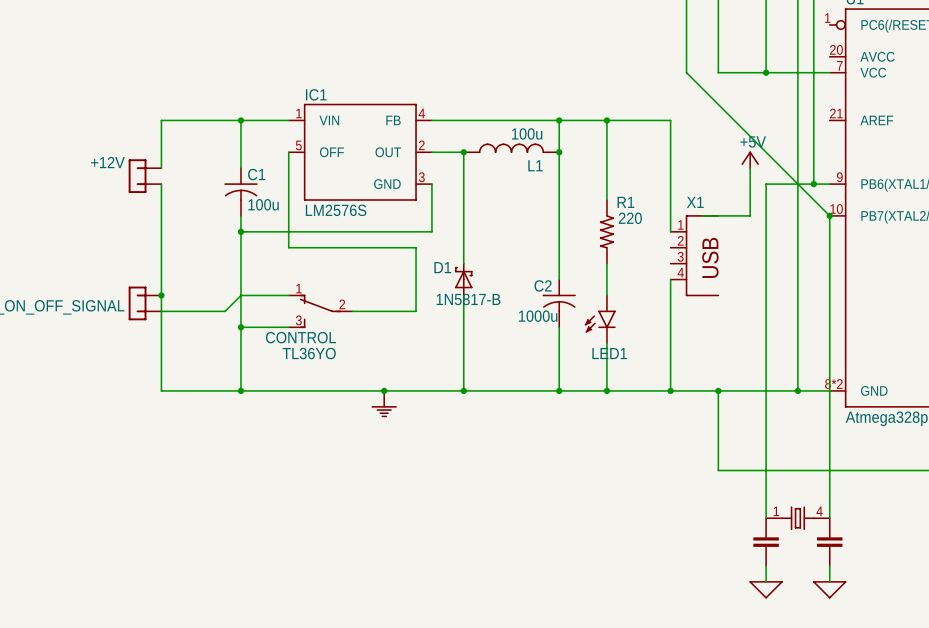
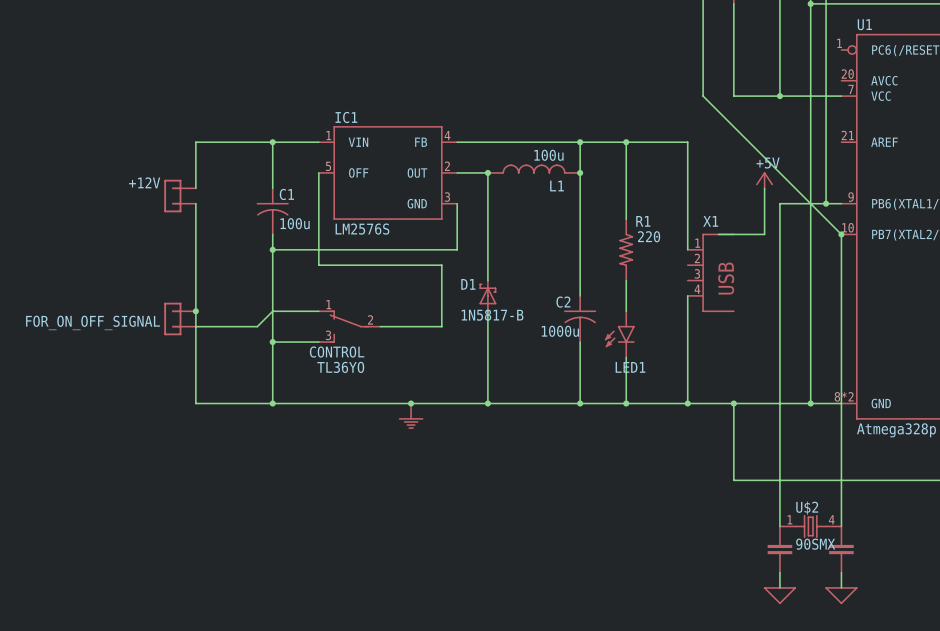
U$2 name: none -> U$2 (807, 508)
U$2 value: none -> 90SMX (815, 544)

